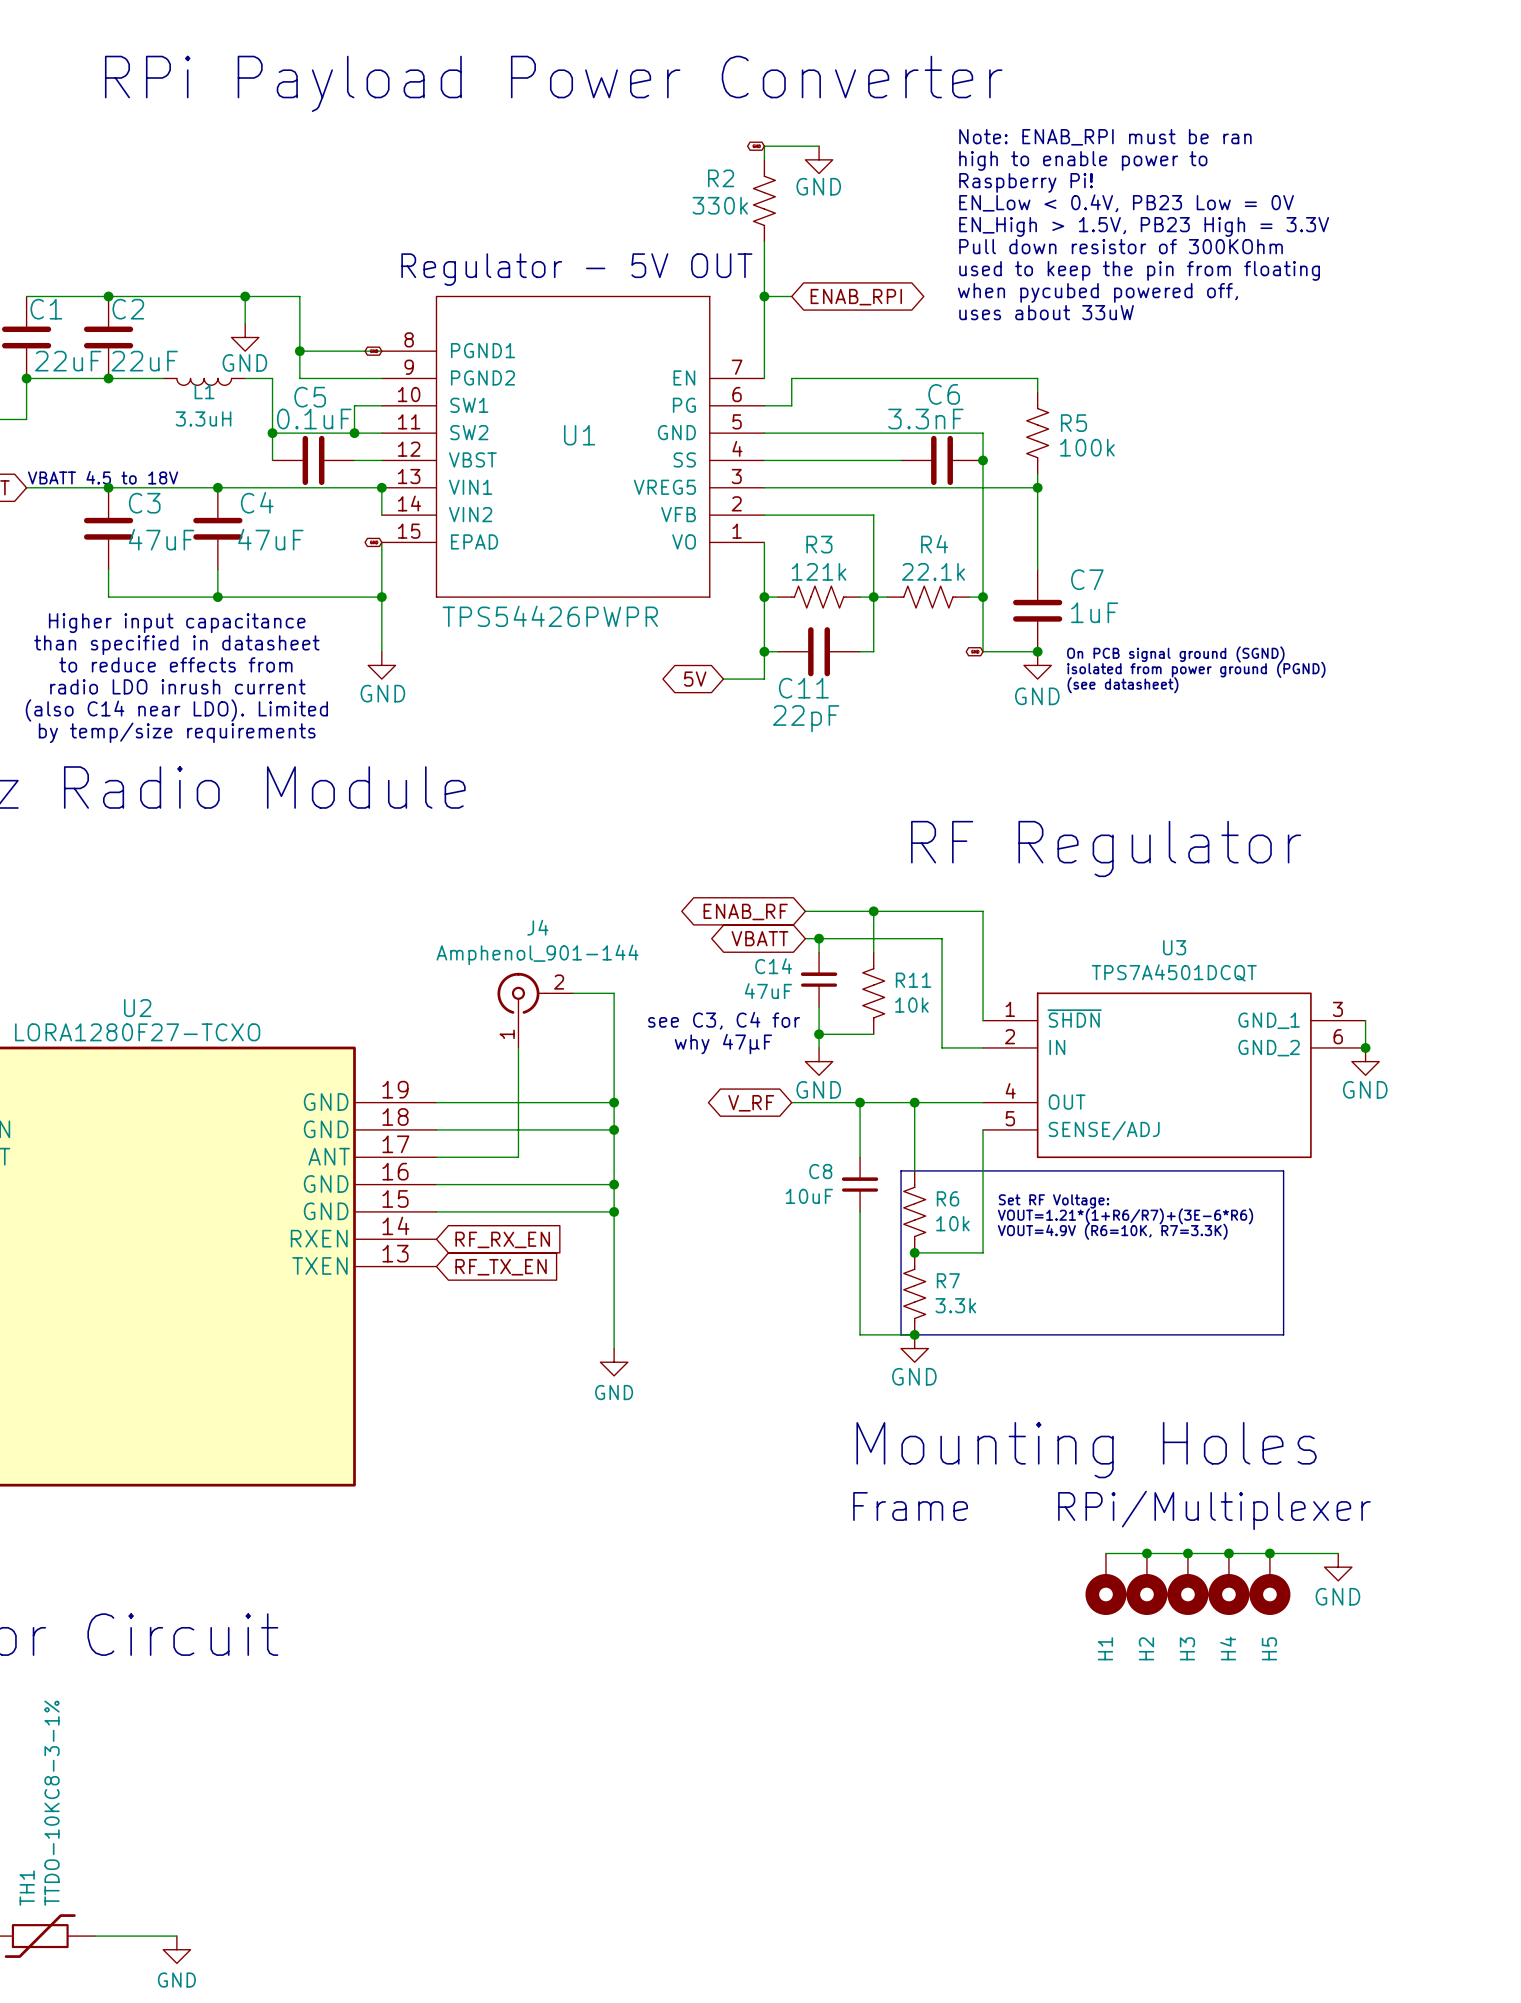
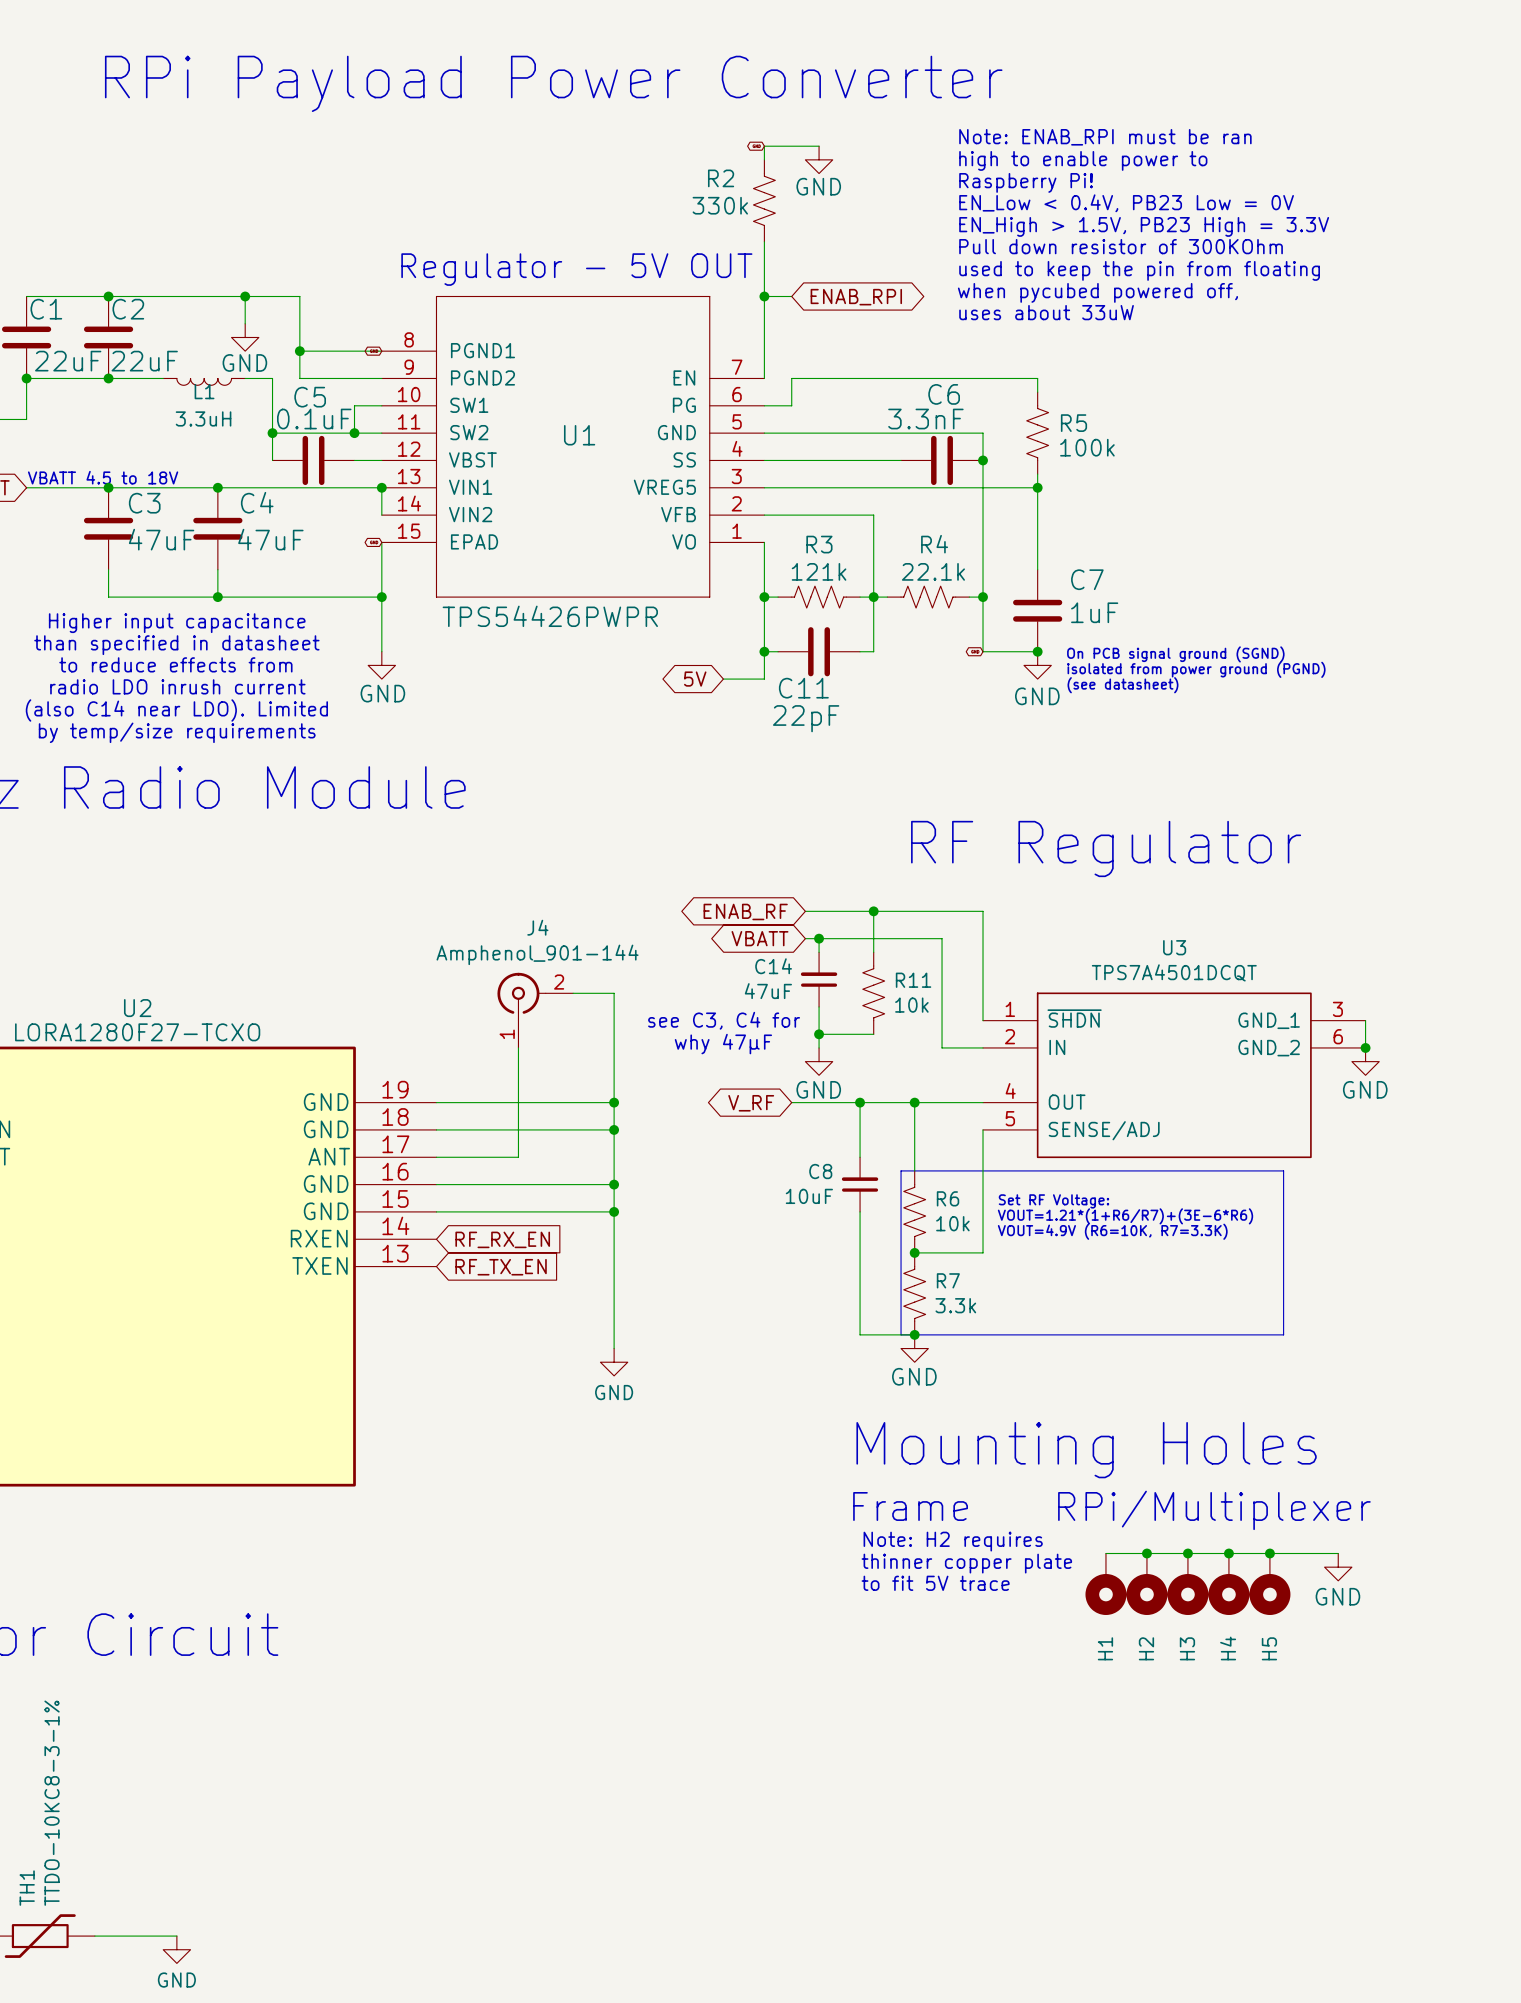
text: none -> Note: H2 requires (953, 1541)
text: none -> thinner copper plate (966, 1563)
text: none -> to fit 5V trace (935, 1583)

